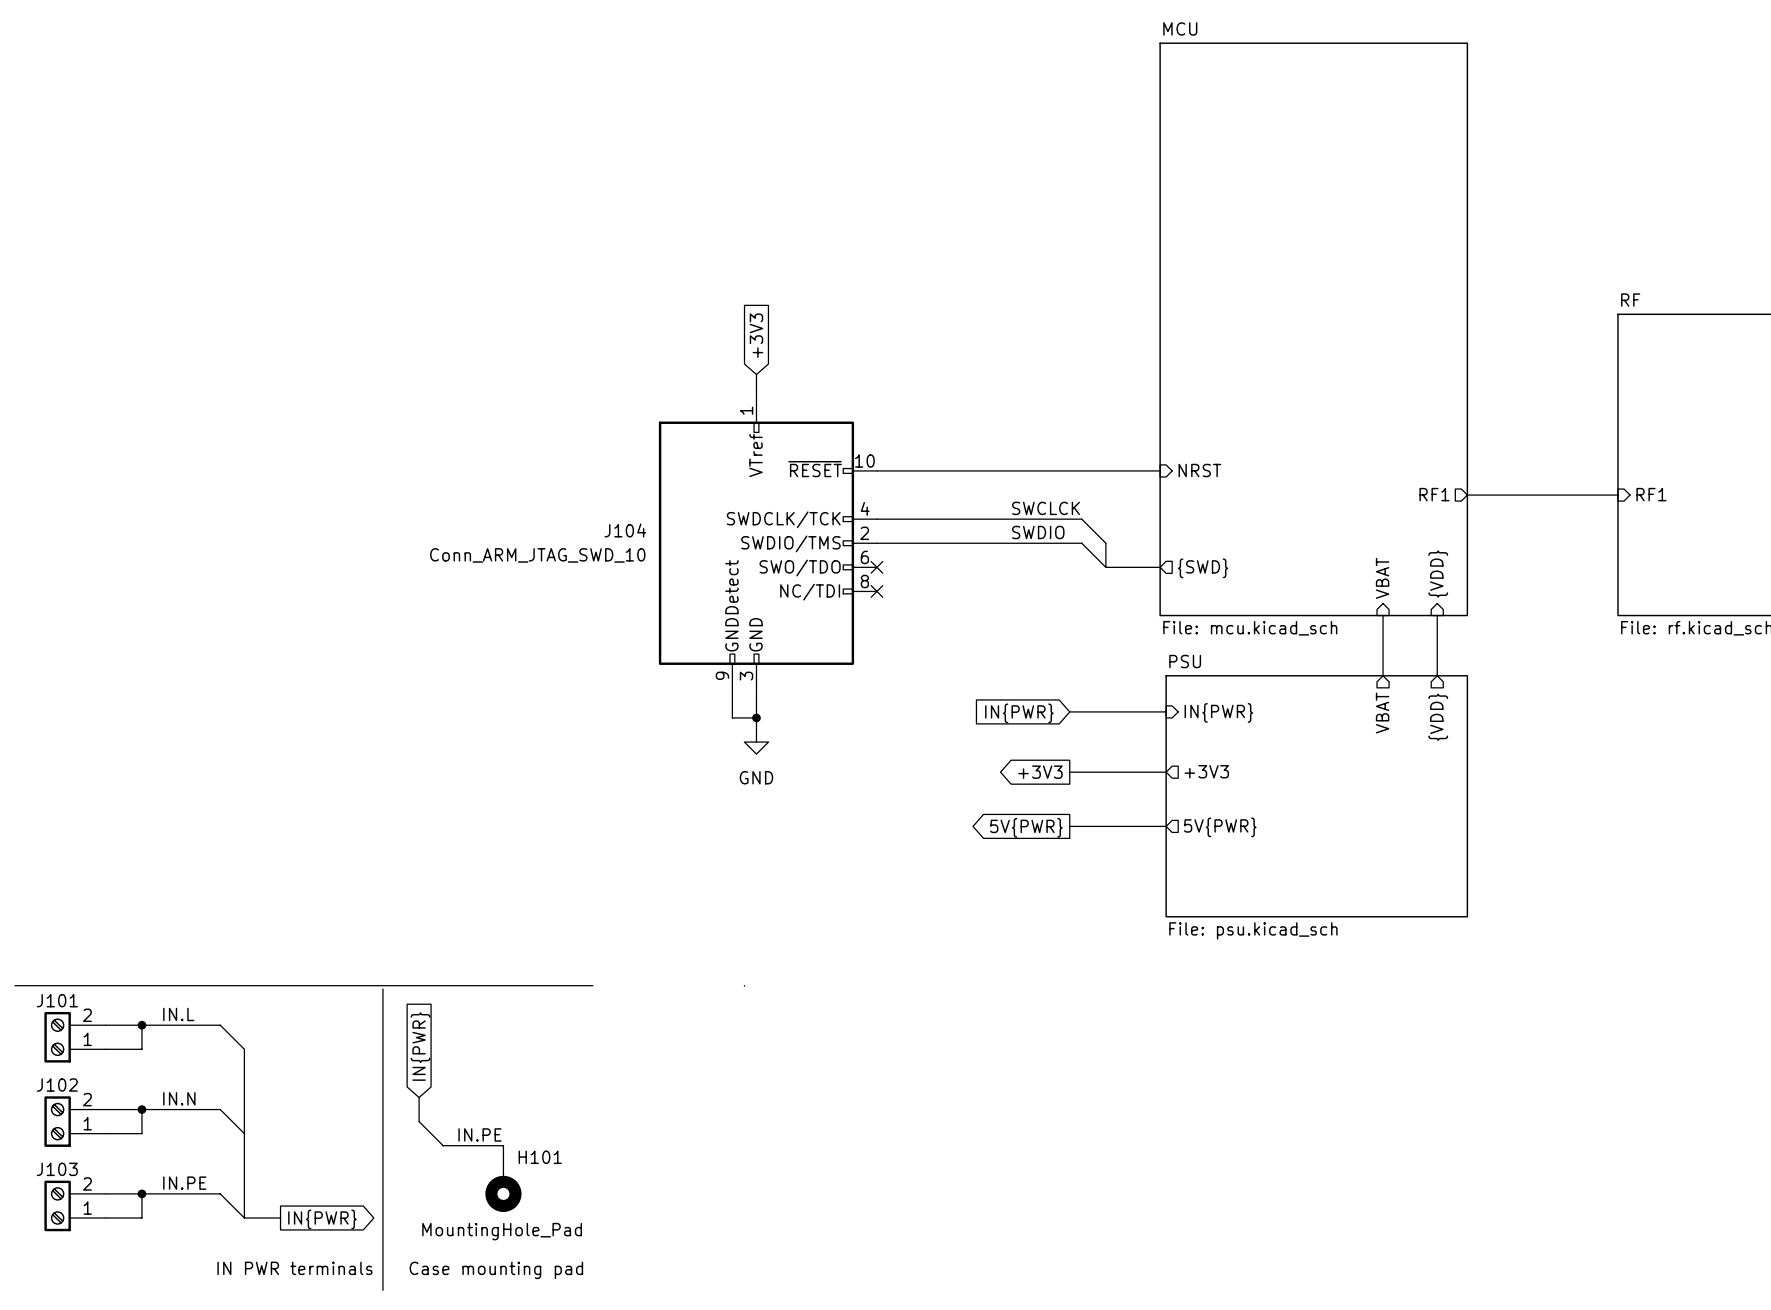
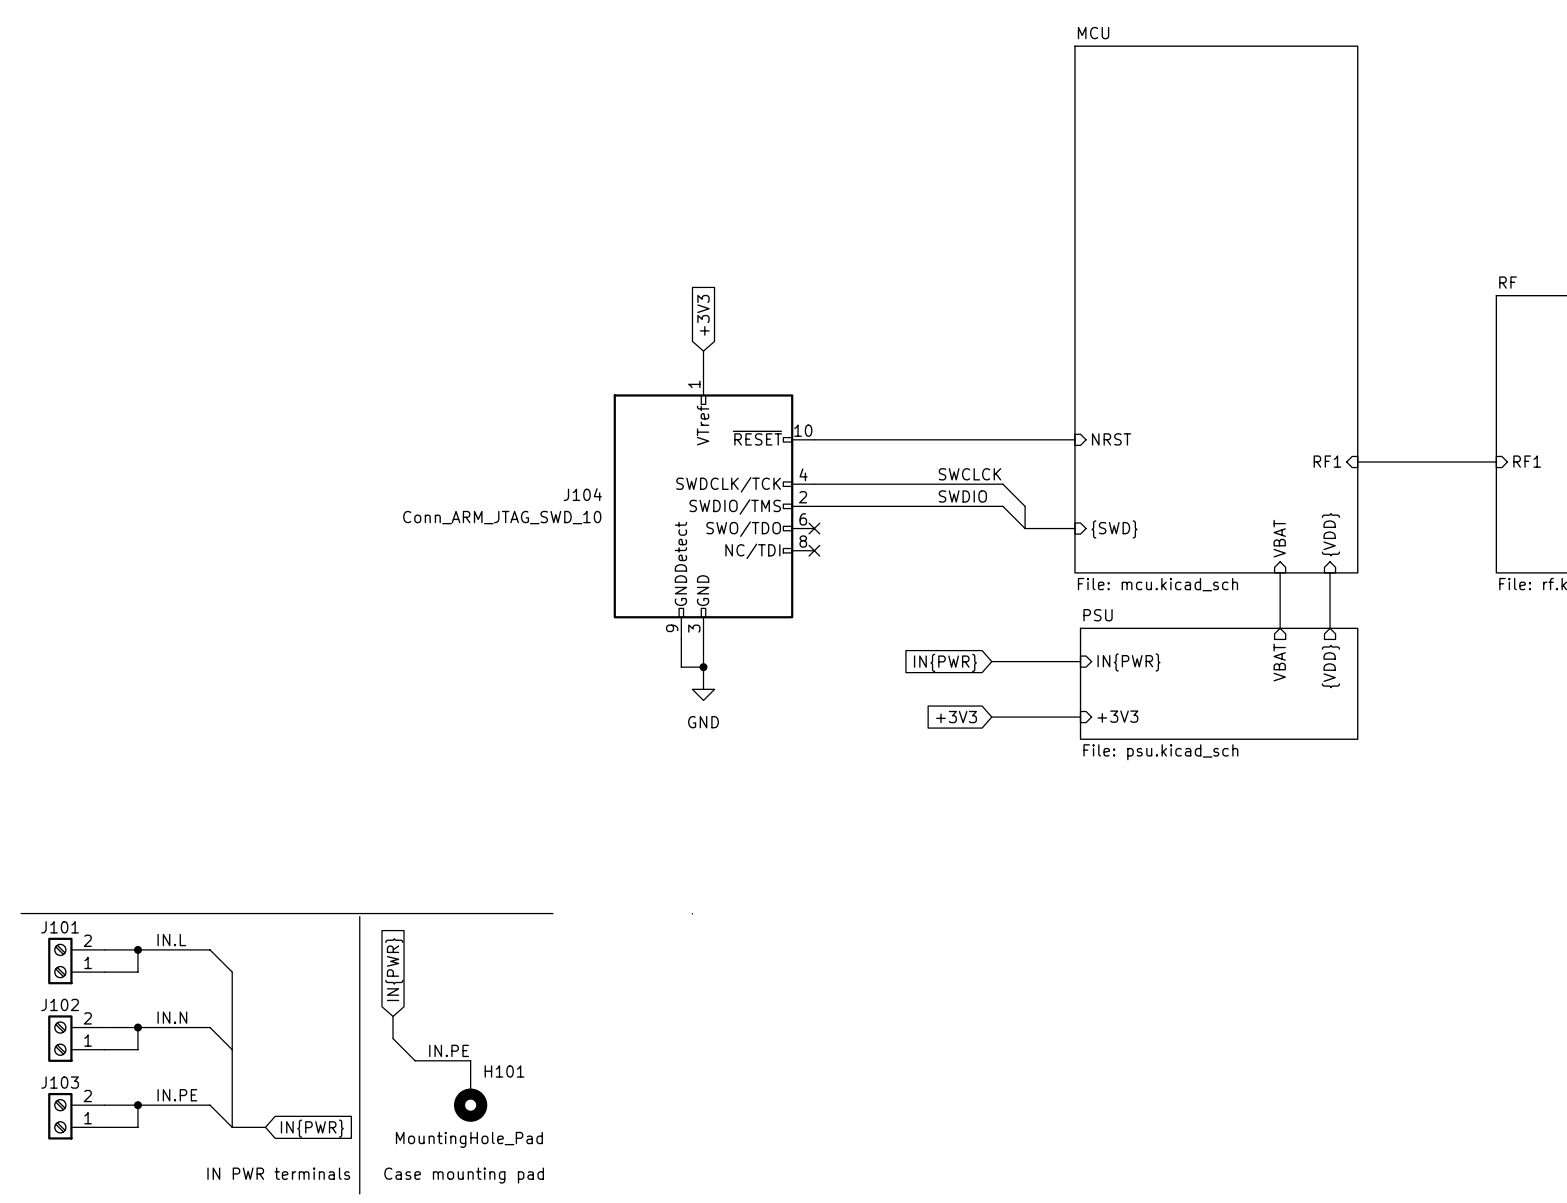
sheet pin shape: output (1434, 494) -> input (1327, 461)
sheet pin shape: output (1203, 568) -> input (1114, 529)
sheet PSU: none -> File: psu.kicad_sch (1219, 683)
sheet pin shape: output (1206, 771) -> input (1117, 716)
global label shape: output (1040, 772) -> input (956, 717)
sheet PSU: File: psu.kicad_sch (1316, 796) -> none
bus: (1069, 826) (1166, 826) -> none
global label: 5V{PWR} (1026, 827) -> none
sheet pin: 5V{PWR} (1220, 827) -> none
global label shape: output (322, 1219) -> input (312, 1128)

